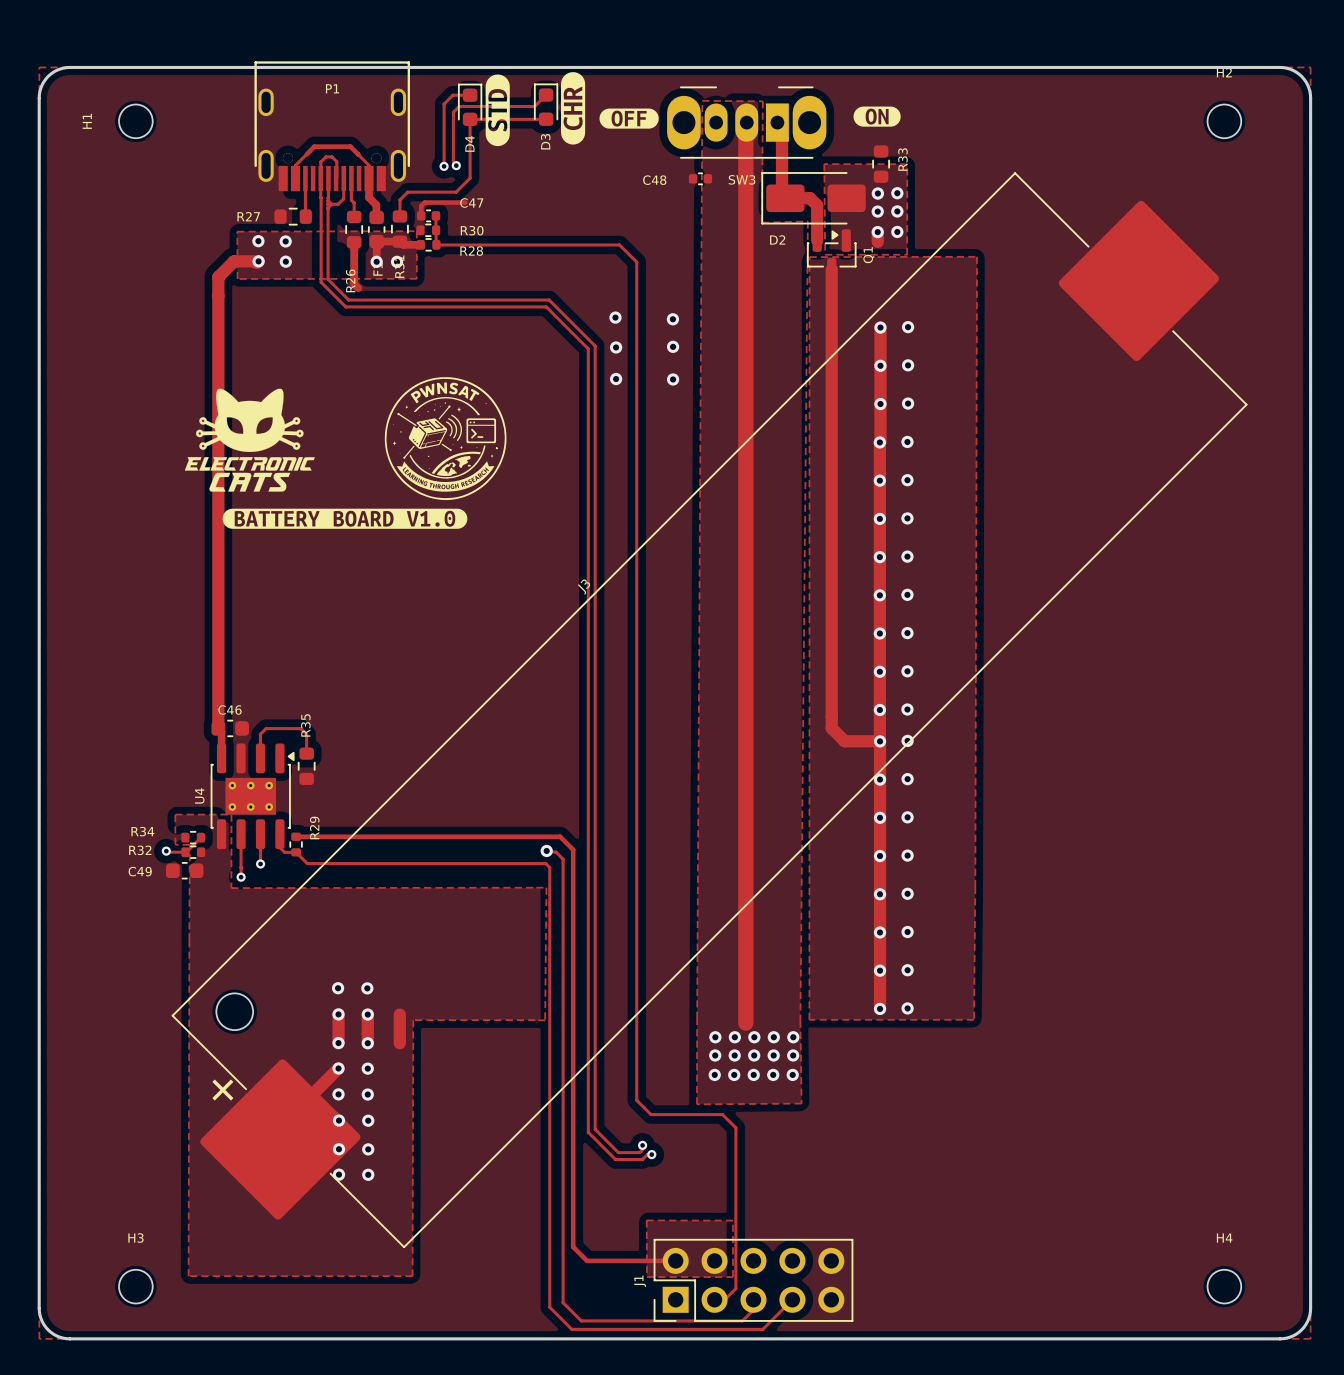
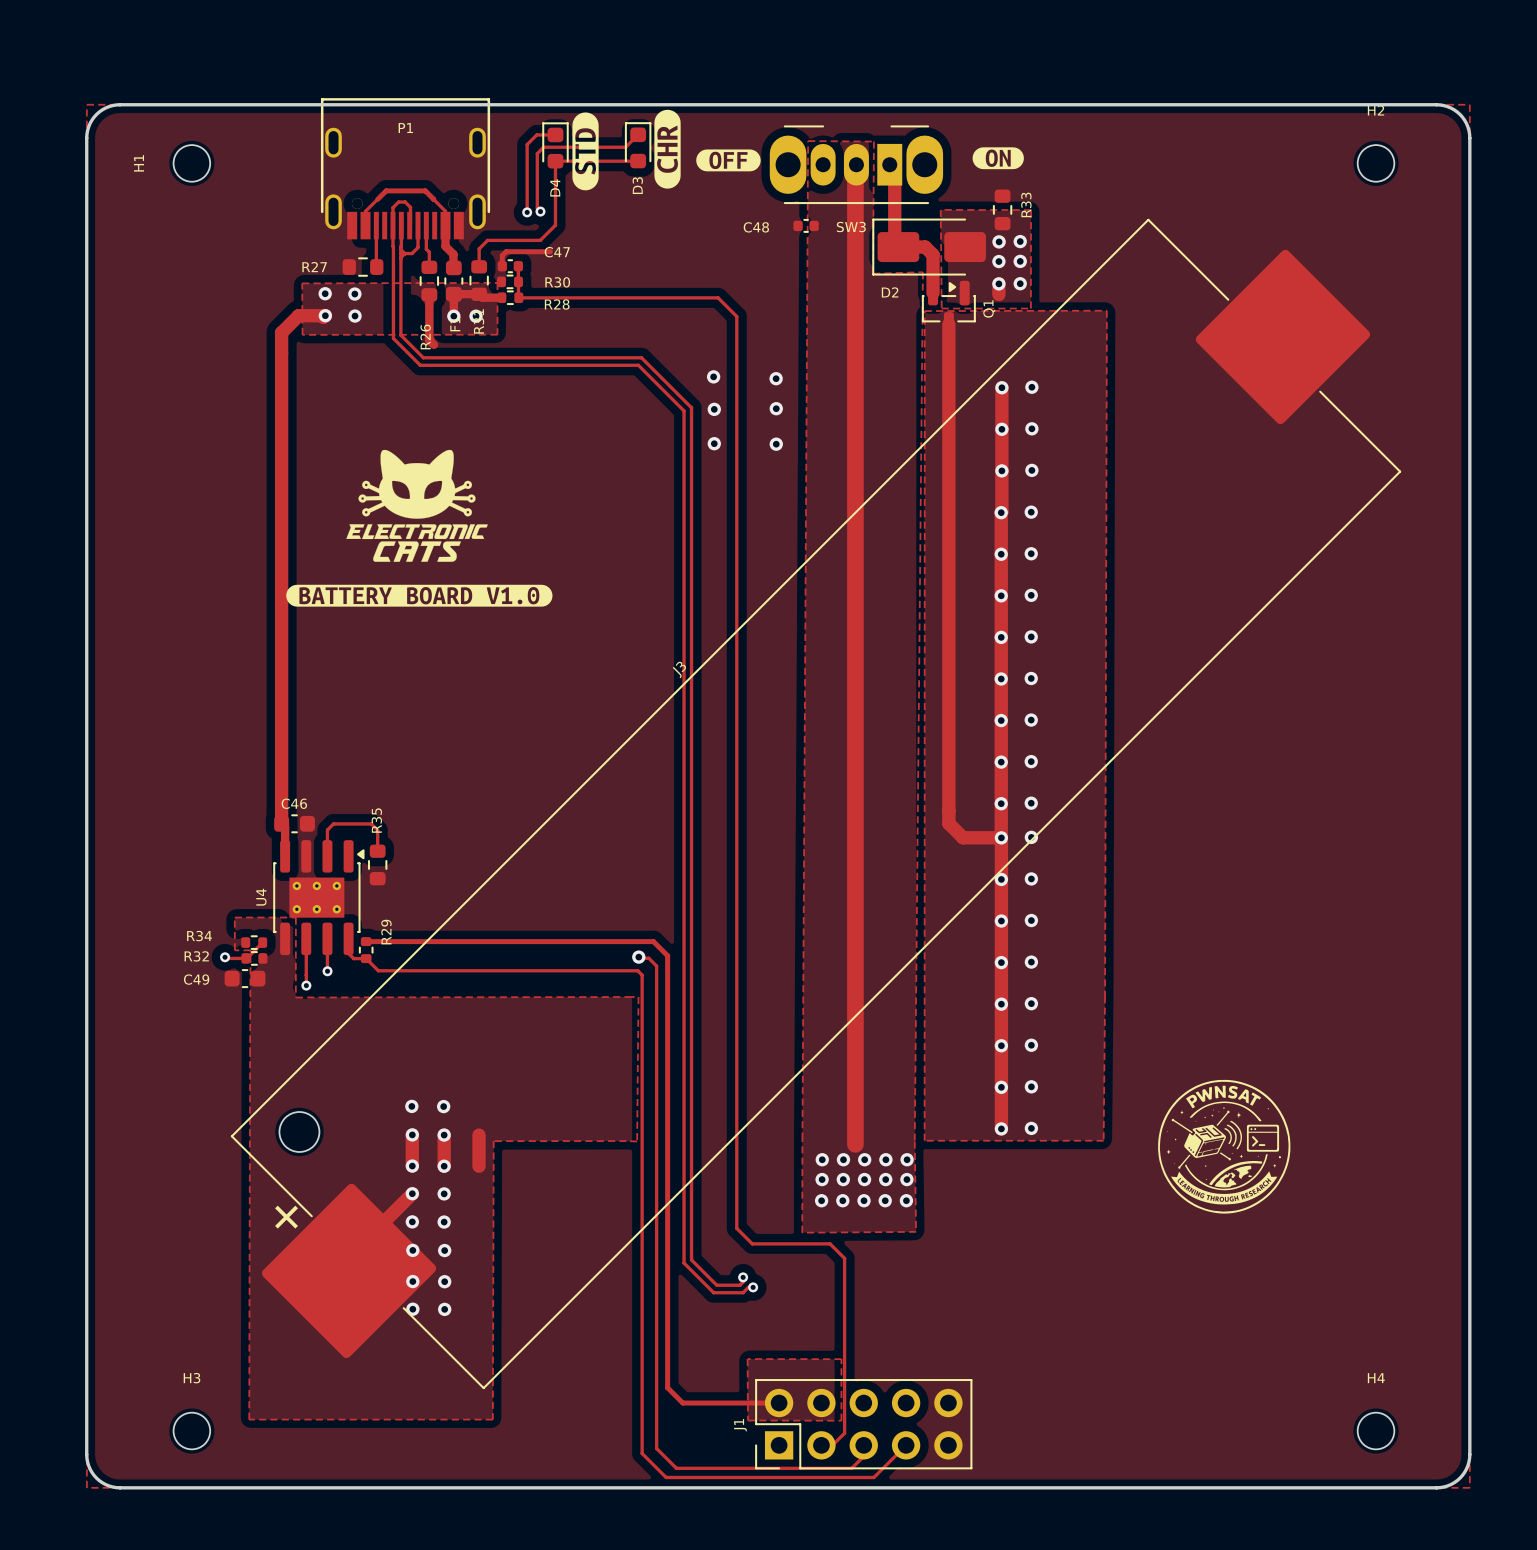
drawing: [384, 377, 507, 501] -> none
drawing position: (249, 440) -> (417, 505)
drawing: none -> [1158, 1079, 1291, 1214]

